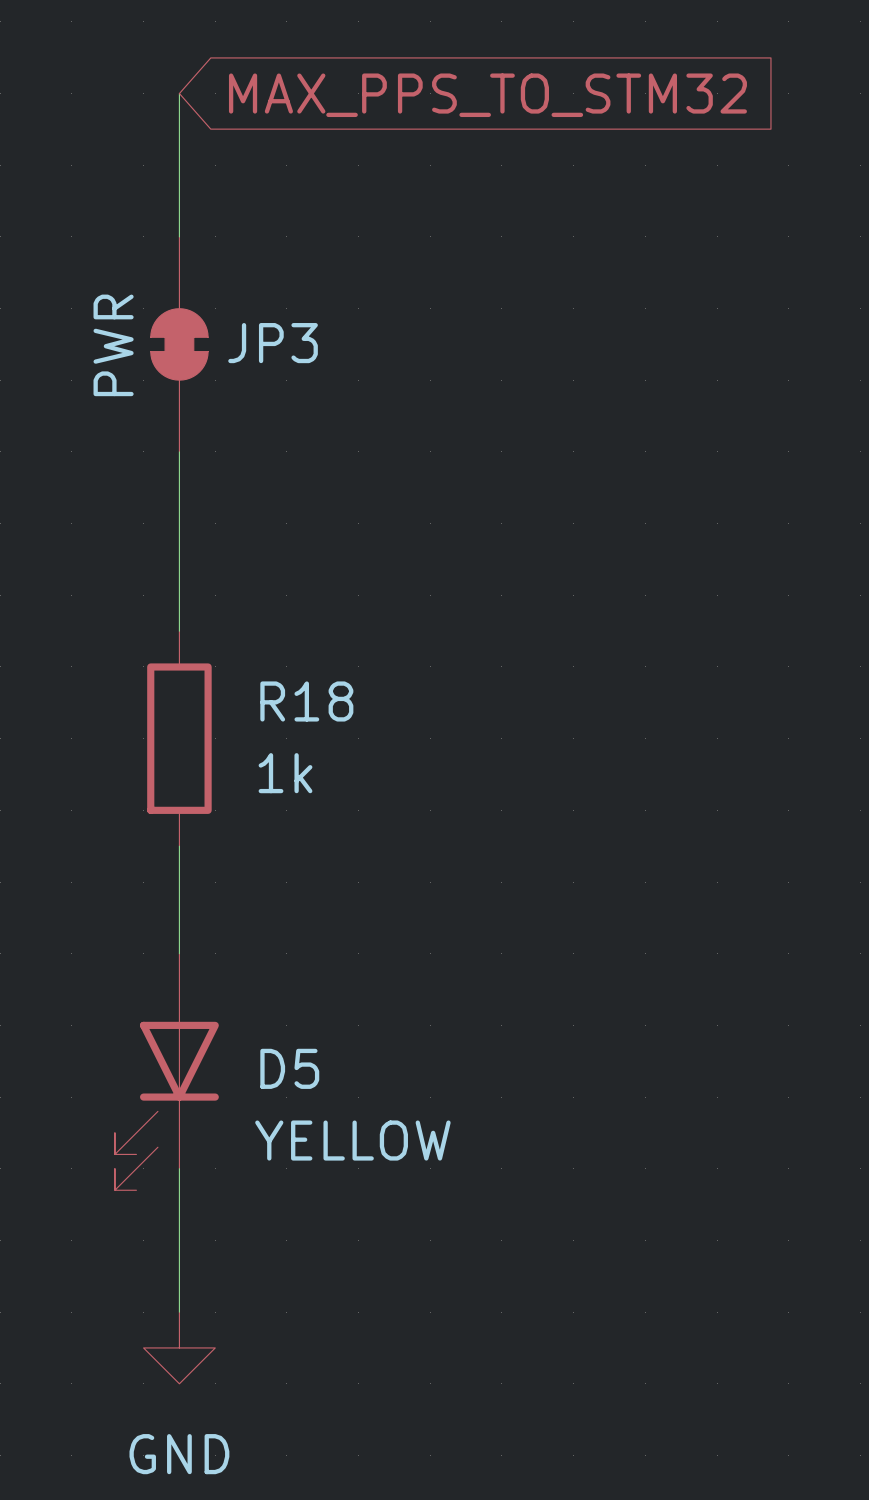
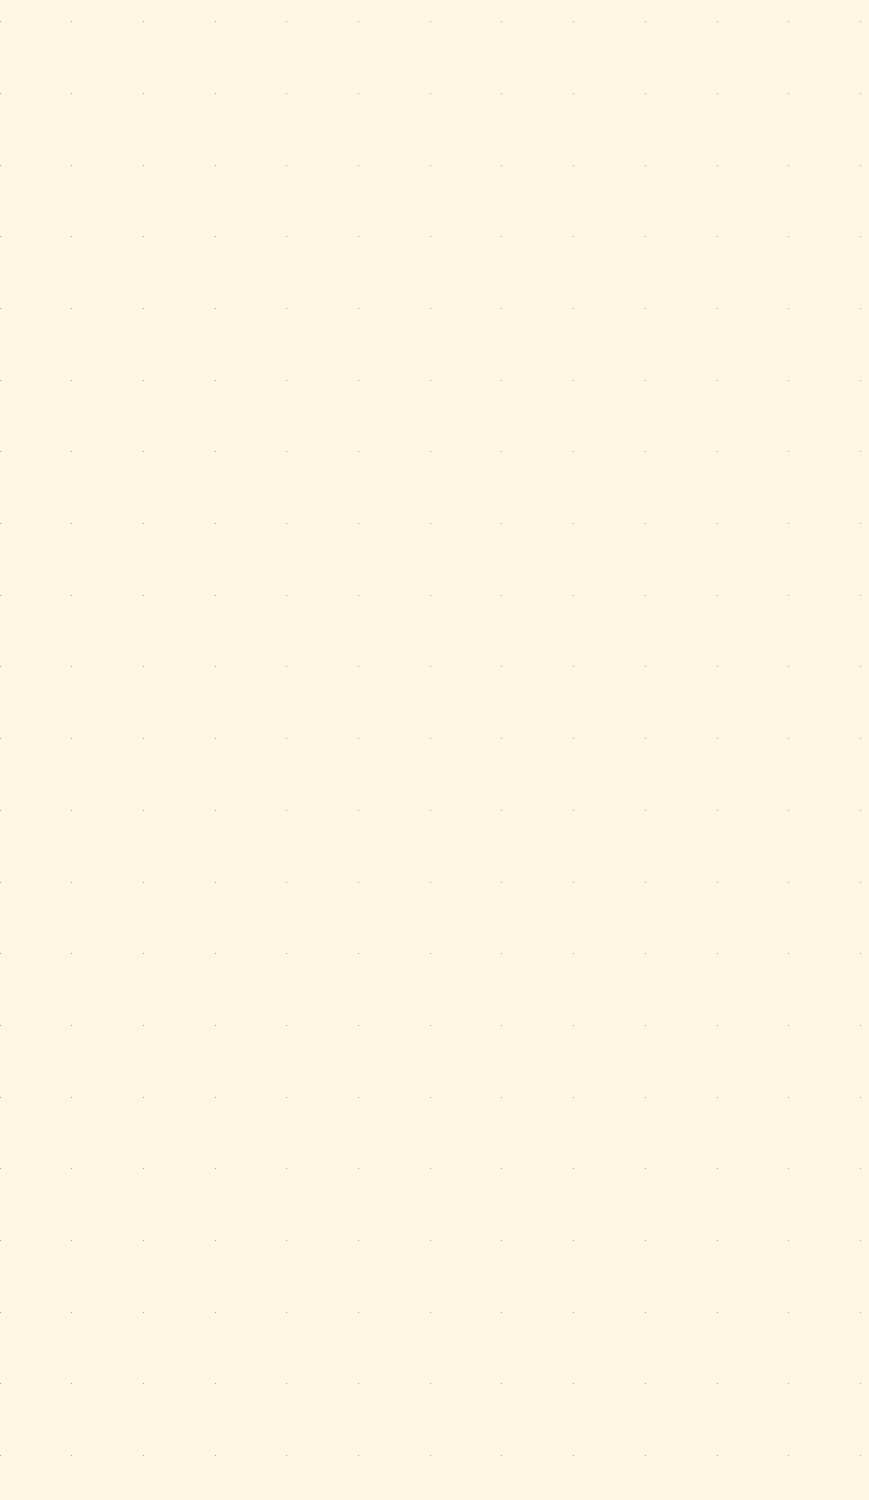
wire: (179, 93) (179, 236) -> none
global label: MAX_PPS_TO_STM32 (487, 95) -> none
JP3: PWR (179, 344) -> none
wire: (179, 451) (179, 631) -> none
R18: 1k (179, 738) -> none
wire: (179, 846) (179, 953) -> none
D5: YELLOW (166, 1071) -> none
wire: (179, 1168) (179, 1312) -> none
power symbol: GND (179, 1347) -> none

